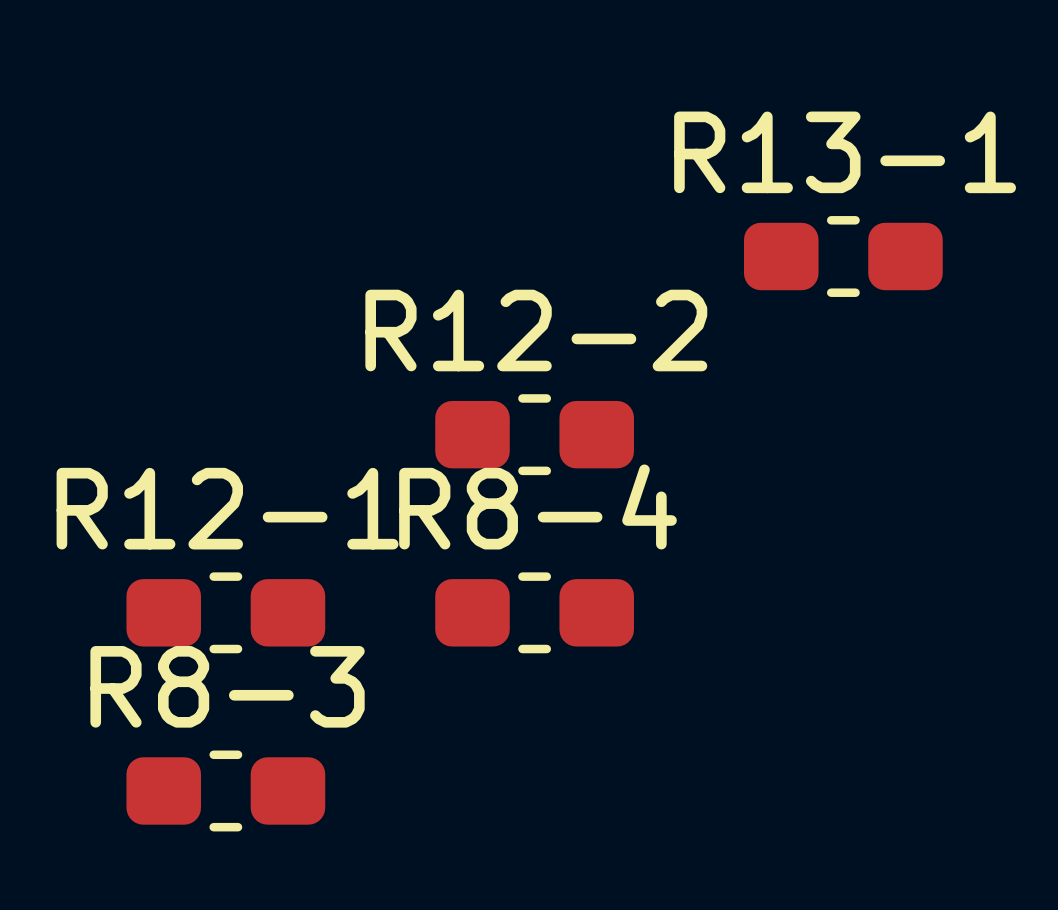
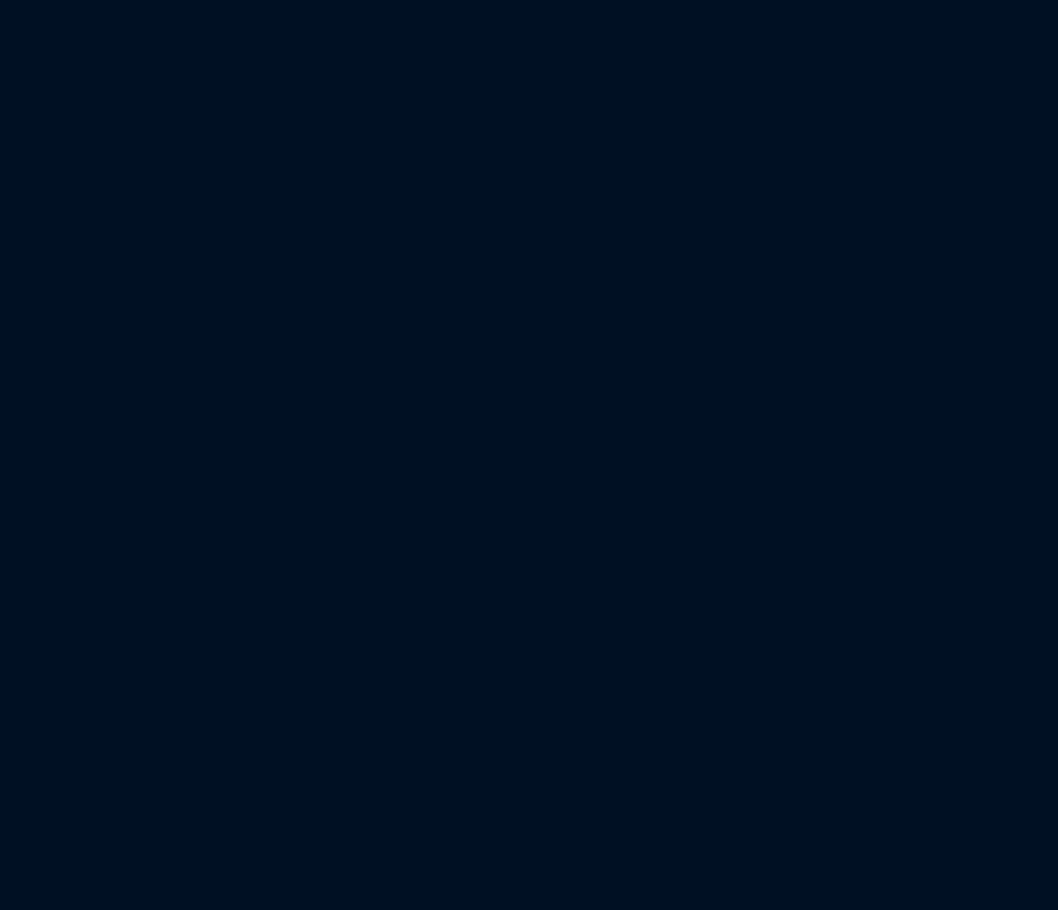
R13-1: (843, 256) -> none
R12-2: (534, 434) -> none
R12-1: (225, 612) -> none
R8-4: (534, 612) -> none
R8-3: (225, 790) -> none

